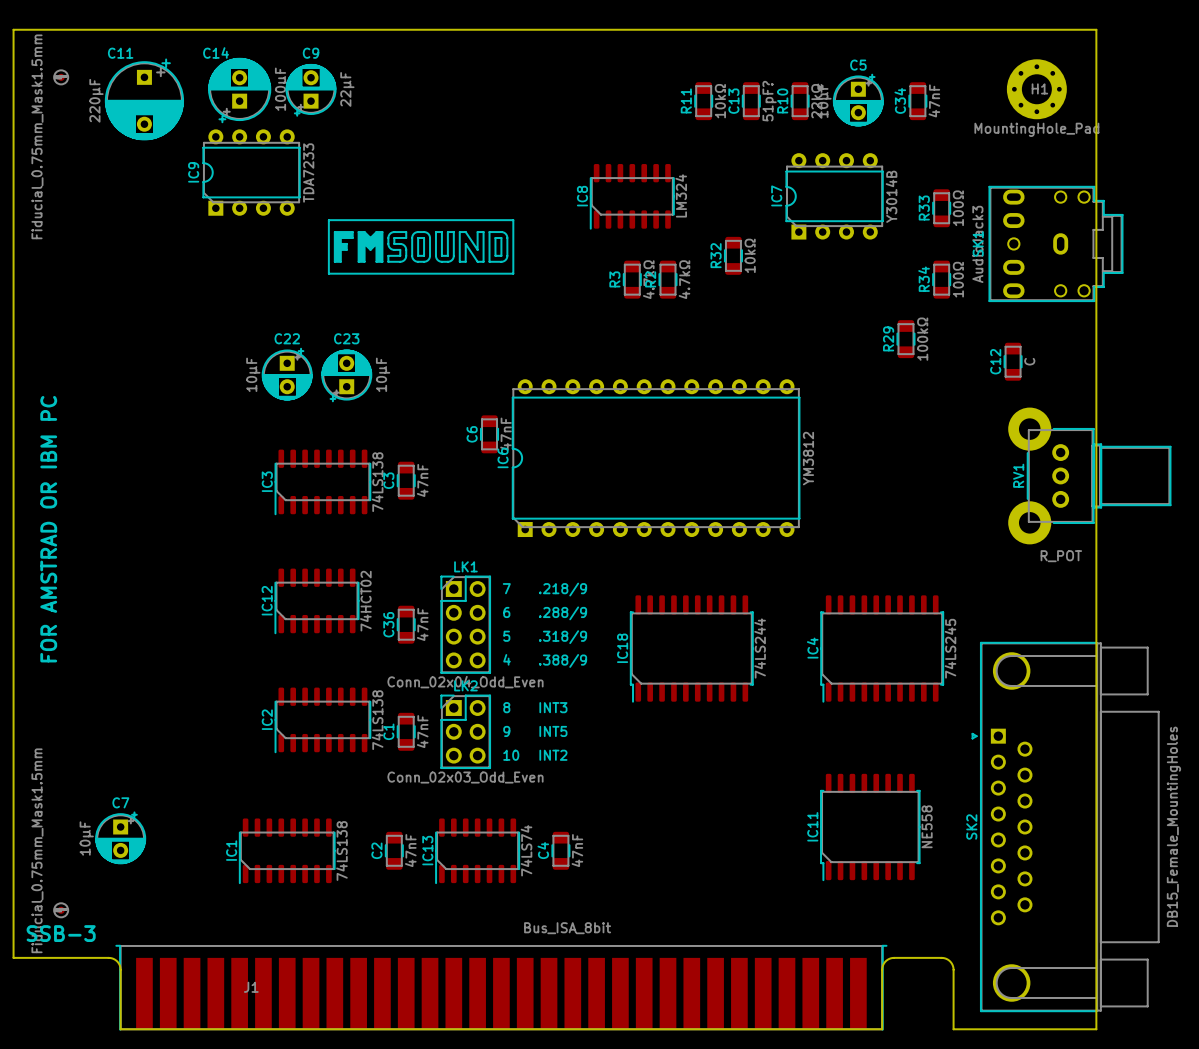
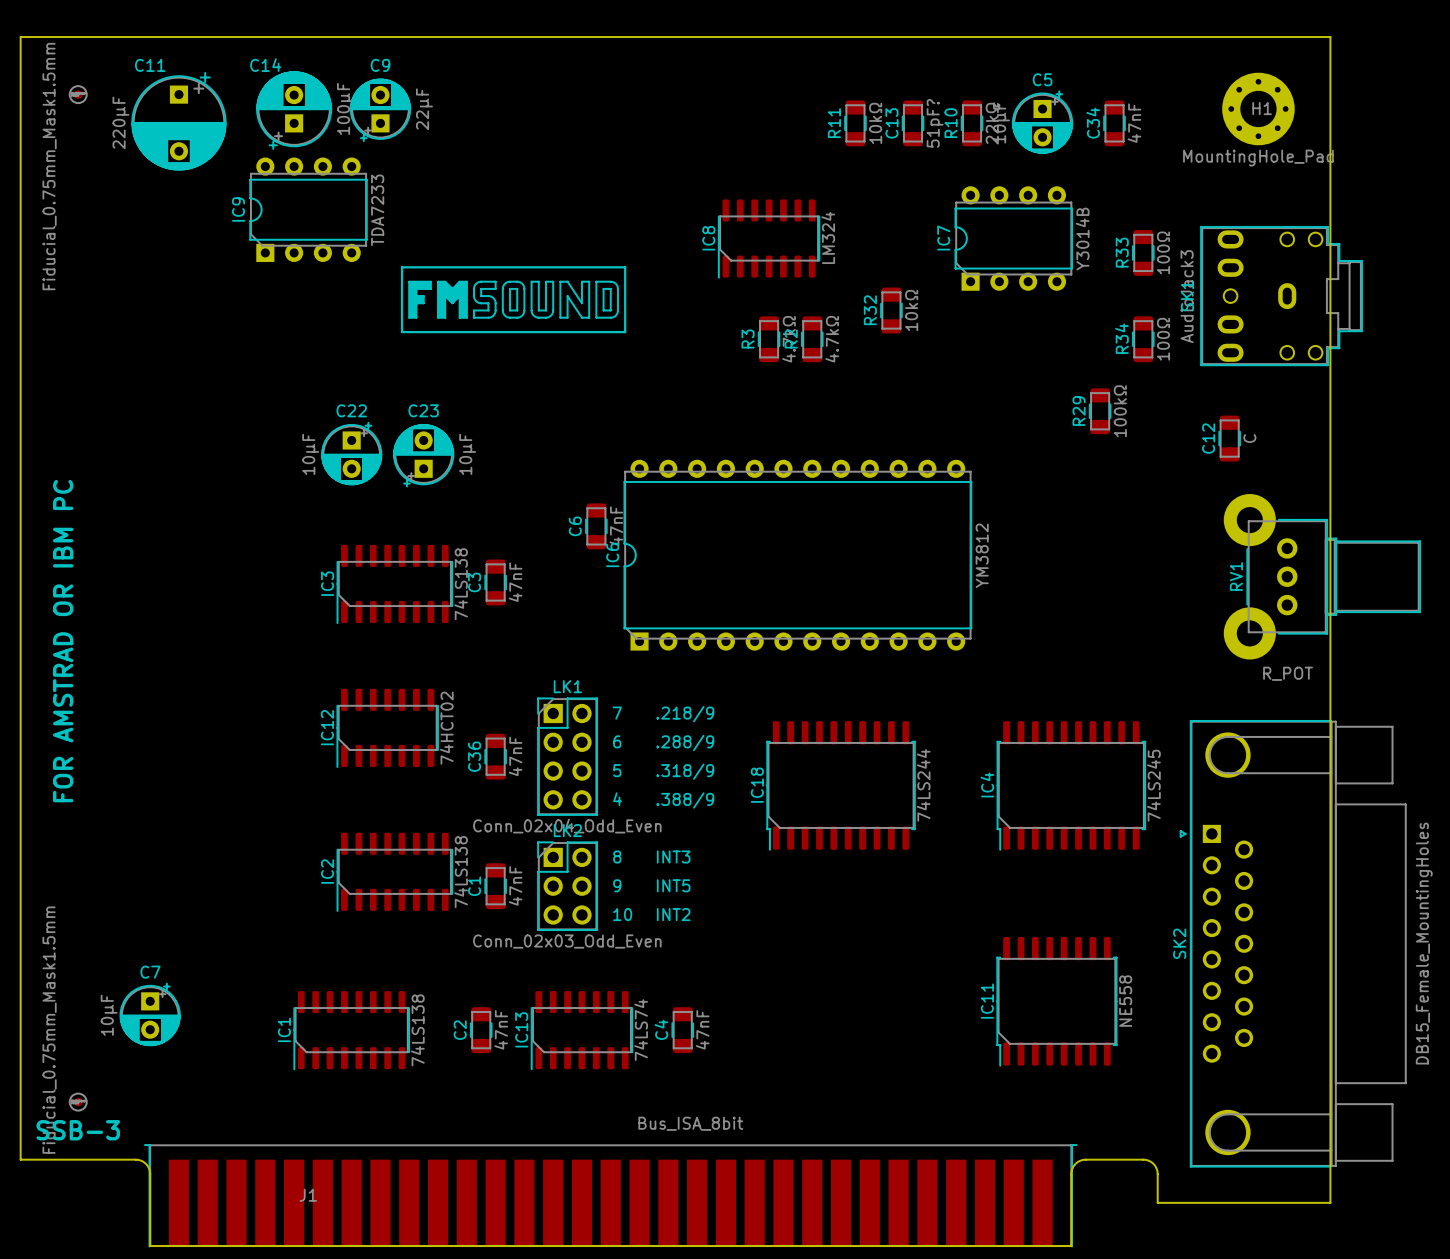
SK2 position: (1065, 827) -> (1293, 943)
board edge: (953, 993) (953, 1029) (1096, 1029) (1096, 993) -> (1157, 1202) (1330, 1202)

